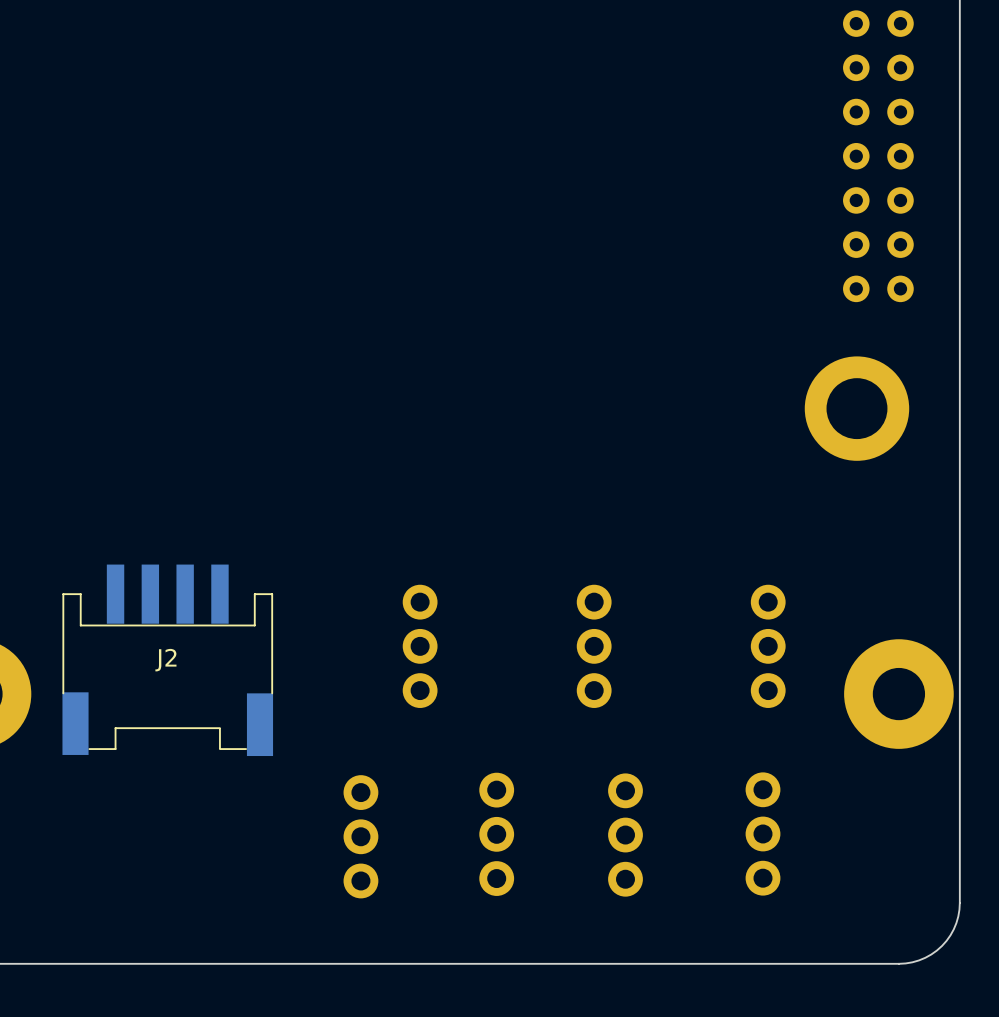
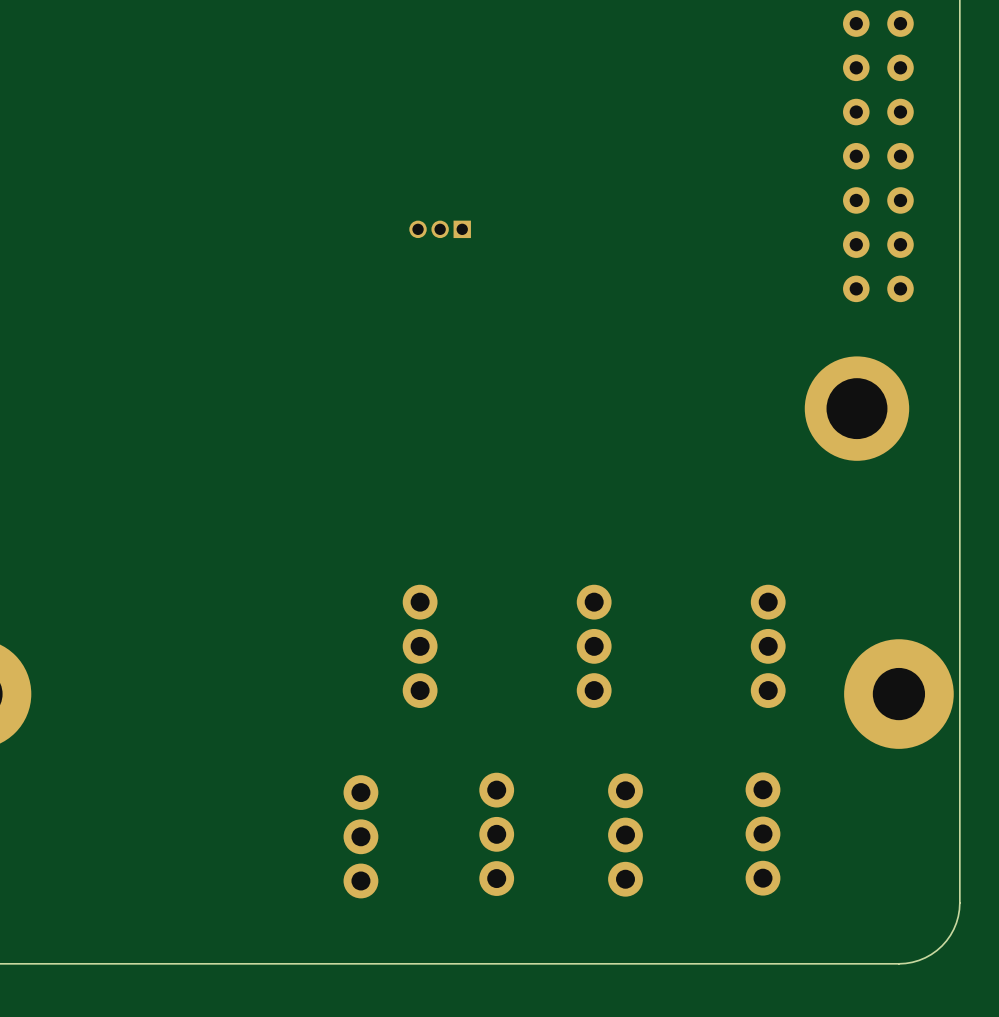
part: none -> (440, 229)
J2: (167, 660) -> none

